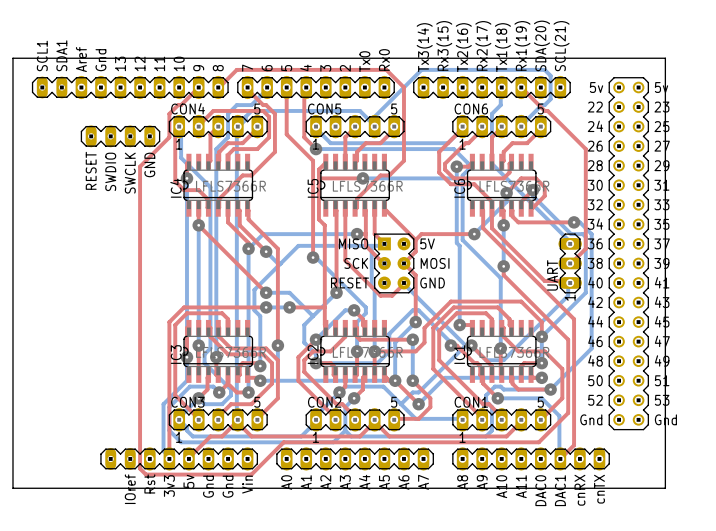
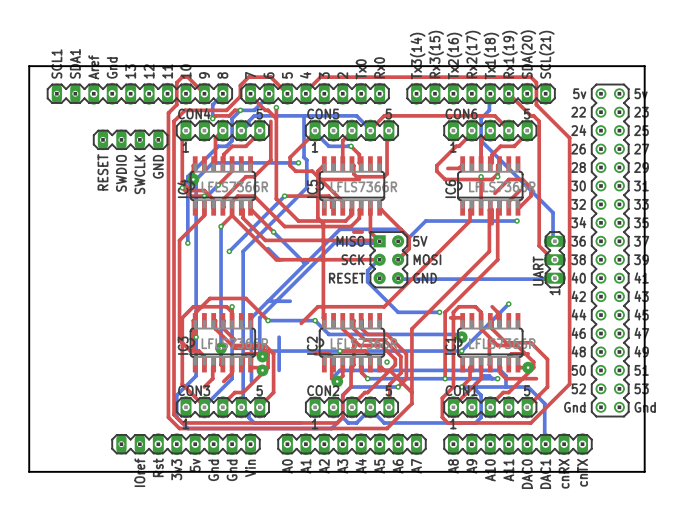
top track: (245, 69) (236, 69) (218, 87) -> (248, 77) (240, 85) (240, 96) (226, 110) (187, 110)
top track: (269, 69) (321, 69) -> (270, 77) (287, 93)
top track: (386, 69) (403, 87) (403, 160) (392, 172) -> (381, 77) (530, 77) (536, 82) (536, 104) (569, 138) (569, 151)
top track: (198, 87) (181, 105) -> none
bottom track: none -> (222, 93) (212, 104) (212, 118)
top track: (286, 87) (286, 134) (313, 160) (313, 257) -> none
top track: (304, 87) (304, 137) (316, 149) -> (304, 93) (320, 77)
top track: none -> (276, 107) (276, 118)
via: none -> (276, 107)
via: none -> (240, 110)
top track: (213, 110) (198, 126) -> (218, 115) (212, 118)
top track: (225, 110) (263, 110) (269, 116) -> (229, 115) (234, 110) (240, 110)
top track: (169, 113) (169, 137) (140, 166) (140, 468) (145, 474) (251, 474) (283, 442) -> (204, 93) (187, 77) (182, 77) (176, 82) (176, 104) (168, 113) (168, 417) (179, 428) (284, 428)
via: none -> (212, 118)
top track: (553, 116) (585, 149) -> (539, 121) (539, 245) (554, 259)
bottom track: (368, 119) (371, 119) (421, 69) (544, 69) (550, 75) (550, 99) (544, 105) (541, 105) (521, 126) -> none
bottom track: (179, 126) (181, 128) (181, 157) (210, 187) (210, 348) (204, 354) (204, 363) (230, 389) (230, 395) (222, 404) (204, 404) (198, 398) (178, 418) (192, 436) (251, 436) -> (304, 115) (304, 157) (306, 160) (306, 187) (243, 251) (243, 406) (241, 407) (254, 422)
bottom track: (237, 126) (237, 419) -> none
top track: none -> (370, 130) (384, 115) (494, 115) (508, 130)
top track: (394, 126) (395, 128) (380, 143) (365, 143) (357, 152) (357, 160) (355, 161) -> (388, 130) (387, 132) (387, 173)
top track: (462, 126) (439, 152) (439, 172) (450, 184) (474, 184) (491, 201) -> (481, 176) (481, 201)
bottom track: (462, 128) (447, 143) (354, 143) -> none
top track: (269, 137) (257, 149) (233, 149) (228, 154) (228, 161) -> (218, 185) (232, 171) (232, 163)
bottom track: (222, 143) (216, 149) (216, 228) -> (226, 146) (218, 146) (187, 176) (187, 182) (190, 185) (190, 190) (187, 193) (187, 243)
top track: none -> (351, 146) (359, 154) (359, 162) (361, 163)
via: none -> (351, 146)
bottom track: (316, 149) (453, 149) (468, 163) (468, 169) (462, 175) (462, 239) (500, 278) (500, 348) -> none
via: (316, 149) -> none
top track: (274, 152) (269, 157) -> (270, 140) (270, 160)
top track: none -> (276, 154) (276, 198) (298, 221) (345, 221) (351, 215) (351, 208)
via: none -> (298, 162)
bottom track: (491, 163) (570, 243) -> (481, 140) (553, 212) (553, 240) (554, 241)
bottom track: (456, 166) (459, 325) -> none
via: (456, 166) -> none
top track: (380, 175) (357, 198) (357, 207) (355, 208) -> (375, 176) (356, 176) (353, 173) (351, 163)
via: none -> (481, 176)
via: none -> (497, 176)
bottom track: (186, 178) (186, 380) (163, 404) (163, 451) (169, 456) -> none
bottom track: (362, 178) (456, 178) -> none
via: (362, 178) -> none
bottom track: none -> (218, 185) (207, 196) (204, 196)
via: none -> (218, 185)
top track: none -> (182, 187) (190, 196) (204, 196)
via: none -> (182, 187)
bottom track: (533, 190) (533, 195) (571, 234) (582, 234) (585, 237) (585, 292) (541, 336) (541, 363) -> none
via: (533, 190) -> none
bottom track: (506, 193) (506, 201) (474, 234) -> none
via: (506, 193) -> none
via: none -> (204, 196)
bottom track: none -> (284, 196) (229, 251)
via: none -> (284, 196)
top track: none -> (232, 208) (232, 201) (237, 196) (254, 196) (284, 226) (351, 226) (359, 218) (359, 209) (361, 208)
top track: (335, 208) (336, 292) -> (333, 208) (331, 207) (331, 198) (328, 196) (284, 196)
top track: (345, 208) (345, 260) (380, 295) (392, 295) (403, 282) -> (342, 208) (342, 201) (312, 171) (295, 171) (290, 165) (290, 157) (315, 130)
top track: (364, 208) (365, 245) (383, 263) -> (221, 226) (232, 215) (276, 259) (378, 259)
top track: (482, 208) (483, 228) (574, 319) (574, 445) (560, 458) -> (471, 208) (470, 209) (470, 221) (384, 306) (317, 306) (301, 323)
top track: (491, 208) (491, 228) (544, 281) (568, 281) (570, 282) -> none
top track: (511, 208) (512, 216) (518, 222) (574, 222) -> (499, 208) (497, 209) (497, 259) (445, 312) (445, 378)
top track: (248, 210) (248, 219) (277, 248) (277, 345) -> (251, 209) (273, 232)
top track: (198, 216) (198, 225) (266, 292) -> (204, 215) (179, 240) (179, 339) (190, 351) (198, 351) (204, 356)
top track: (228, 216) (228, 222) (248, 242) (248, 248) -> none
top track: (239, 219) (239, 225) (266, 251) -> (243, 218) (265, 240) (378, 240)
bottom track: none -> (517, 221) (425, 221) (409, 237)
via: none -> (517, 221)
bottom track: (574, 222) (579, 222) (591, 234) (591, 348) (550, 389) (509, 389) -> none
via: (574, 222) -> none
bottom track: (198, 225) (198, 345) -> none
via: (198, 225) -> none
bottom track: (503, 225) (503, 266) -> none
via: (503, 225) -> none
via: none -> (221, 226)
bottom track: none -> (273, 232) (304, 262) (306, 262)
via: none -> (273, 232)
bottom track: (357, 234) (263, 234) (248, 248) (248, 325) -> (409, 237) (400, 229) (340, 229) (251, 317)
via: (357, 234) -> none
top track: (474, 234) (421, 234) (415, 239) -> none
via: (474, 234) -> none
via: none -> (187, 243)
bottom track: (336, 245) (298, 245) (254, 289) (254, 310) (260, 316) (260, 366) -> (334, 243) (259, 317) (259, 356)
bottom track: (371, 245) (371, 275) -> (379, 259) (367, 270)
via: (248, 248) -> none
top track: (585, 248) (570, 263) -> none
via: (266, 251) -> none
via: none -> (229, 251)
bottom track: (313, 257) (316, 257) (365, 307) (365, 313) (357, 322) (357, 351) -> none
via: (313, 257) -> none
top track: (403, 263) (415, 275) (415, 322) -> none
top track: (503, 266) (503, 275) (568, 339) (568, 413) -> (569, 245) (569, 384) (553, 400)
via: (503, 266) -> none
bottom track: (403, 283) (465, 345) -> none
bottom track: (568, 283) (568, 295) (503, 360) (486, 360) (471, 345) (465, 345) -> (553, 279) (398, 279)
bottom track: (374, 289) (374, 351) -> (370, 284) (398, 312) (439, 312)
bottom track: (266, 292) (289, 292) (313, 316) -> none
via: (266, 292) -> none
bottom track: (336, 292) (304, 325) (304, 342) (316, 354) (316, 363) (377, 363) (389, 351) (389, 333) (412, 310) (418, 310) (450, 342) (450, 345) -> none
via: (336, 292) -> none
top track: (266, 307) (184, 307) (169, 322) (169, 458) -> none
via: (266, 307) -> none
top track: (289, 307) (324, 307) -> none
via: (289, 307) -> none
top track: (354, 310) (362, 319) (364, 327) -> (398, 387) (406, 378) (406, 353) (387, 334) (367, 334) (362, 328) (361, 320)
bottom track: (354, 310) (345, 310) (316, 339) -> none
via: (354, 310) -> none
bottom track: none -> (508, 304) (461, 351) (259, 351)
via: none -> (508, 304)
bottom track: none -> (232, 306) (232, 378) (204, 407)
via: none -> (232, 306)
top track: (468, 313) (456, 313) (439, 330) (439, 360) (483, 404) (489, 404) (503, 418) (501, 419) -> (481, 320) (481, 328) (497, 345) (517, 345) (533, 362) (533, 367) (508, 392) (503, 392) (490, 407)
top track: (503, 313) (497, 307) (453, 307) (433, 327) (433, 369) (482, 419) -> none
via: none -> (439, 312)
bottom track: (415, 322) (395, 342) (395, 380) -> (505, 387) (505, 375) (500, 370) (389, 370)
via: (415, 322) -> none
via: (459, 325) -> none
top track: none -> (268, 320) (245, 298) (209, 298) (196, 312) (196, 337)
bottom track: none -> (268, 320) (315, 320) (328, 334) (461, 334)
via: none -> (268, 320)
via: none -> (315, 320)
top track: (345, 336) (330, 351) (313, 351) (304, 360) (304, 371) (336, 404) (342, 404) (357, 418) (355, 419) -> (342, 328) (359, 345) (381, 345) (395, 359) (395, 364) (367, 392) (364, 392) (351, 407)
top track: (541, 336) (541, 322) (521, 301) (450, 301) (424, 327) (424, 342) (415, 351) (374, 351) (374, 366) -> (340, 351) (364, 351) (370, 356)
via: (541, 336) -> none
top track: (316, 339) (298, 357) (298, 380) (335, 419) -> none
via: (316, 339) -> none
top track: (360, 339) (412, 339) -> none
bottom track: (412, 339) (412, 380) -> none
via: (412, 339) -> none
via: none -> (196, 337)
top track: (198, 345) (198, 366) -> none
via: (198, 345) -> none
via: (277, 345) -> none
top track: (450, 345) (456, 345) (474, 363) (480, 366) (483, 383) (497, 398) -> none
via: (450, 345) -> none
bottom track: (465, 345) (418, 392) (412, 392) (401, 404) -> none
top track: (471, 345) (491, 366) (491, 375) -> (453, 407) (481, 378) (481, 365)
top track: (230, 348) (266, 348) (277, 360) (277, 398) (272, 404) -> none
via: (500, 348) -> none
via: (357, 351) -> none
via: (374, 351) -> none
top track: none -> (232, 345) (234, 348) (262, 348) (268, 353) (268, 367) (243, 392)
via: (186, 357) -> none
via: none -> (340, 351)
via: none -> (461, 351)
via: (316, 363) -> none
via: (541, 363) -> none
via: none -> (387, 362)
top track: none -> (333, 365) (331, 378)
top track: (364, 375) (362, 377) (362, 389) (354, 398) -> (361, 365) (362, 373) (367, 378)
top track: none -> (471, 365) (470, 378) (461, 387)
bottom track: (541, 377) (445, 377) (418, 404) -> none
bottom track: (260, 380) (342, 380) -> (331, 378) (340, 370)
via: (395, 380) -> none
top track: (412, 380) (430, 398) (430, 407) (418, 418) (395, 418) -> (356, 331) (364, 339) (384, 339) (400, 356) (400, 373) (389, 384) (389, 406)
via: (412, 380) -> none
top track: (228, 383) (236, 392) (248, 392) -> none
top track: (272, 383) (251, 404) (239, 404) -> (273, 373) (273, 392)
bottom track: (189, 386) (213, 386) (219, 392) -> (196, 375) (196, 179) (212, 162) (298, 162)
bottom track: none -> (367, 378) (492, 378)
via: none -> (367, 378)
via: none -> (445, 378)
via: none -> (497, 378)
via: (550, 389) -> none
via: (219, 392) -> none
via: (248, 392) -> none
via: (198, 398) -> none
bottom track: none -> (351, 387) (398, 387)
via: (354, 398) -> none
via: none -> (398, 387)
bottom track: none -> (461, 387) (486, 387)
via: none -> (461, 387)
via: (497, 398) -> none
via: (418, 404) -> none
bottom track: (462, 419) (415, 418) (383, 386) (345, 386) (316, 415) (316, 421) (301, 436) -> none
top track: (521, 419) (506, 436) -> (530, 422) (494, 422)
top track: (236, 421) (222, 436) -> (254, 422) (226, 422)
top track: (236, 421) (251, 436) -> none
top track: (374, 421) (360, 436) (339, 436) -> (351, 365) (351, 387) (342, 395) (342, 417) (337, 422)
top track: (374, 421) (389, 436) (456, 436) -> (458, 306) (453, 312) (453, 387) (442, 398) (442, 417) (447, 422)
bottom track: none -> (370, 409) (384, 422)
top track: (210, 436) (188, 458) -> (215, 422) (182, 422) (174, 414) (174, 121) (176, 118)
bottom track: (360, 436) (389, 436) -> (356, 422) (370, 409)
top track: (544, 436) (538, 442) (392, 442) -> (490, 208) (489, 251) (411, 328) (411, 403) (387, 428)

